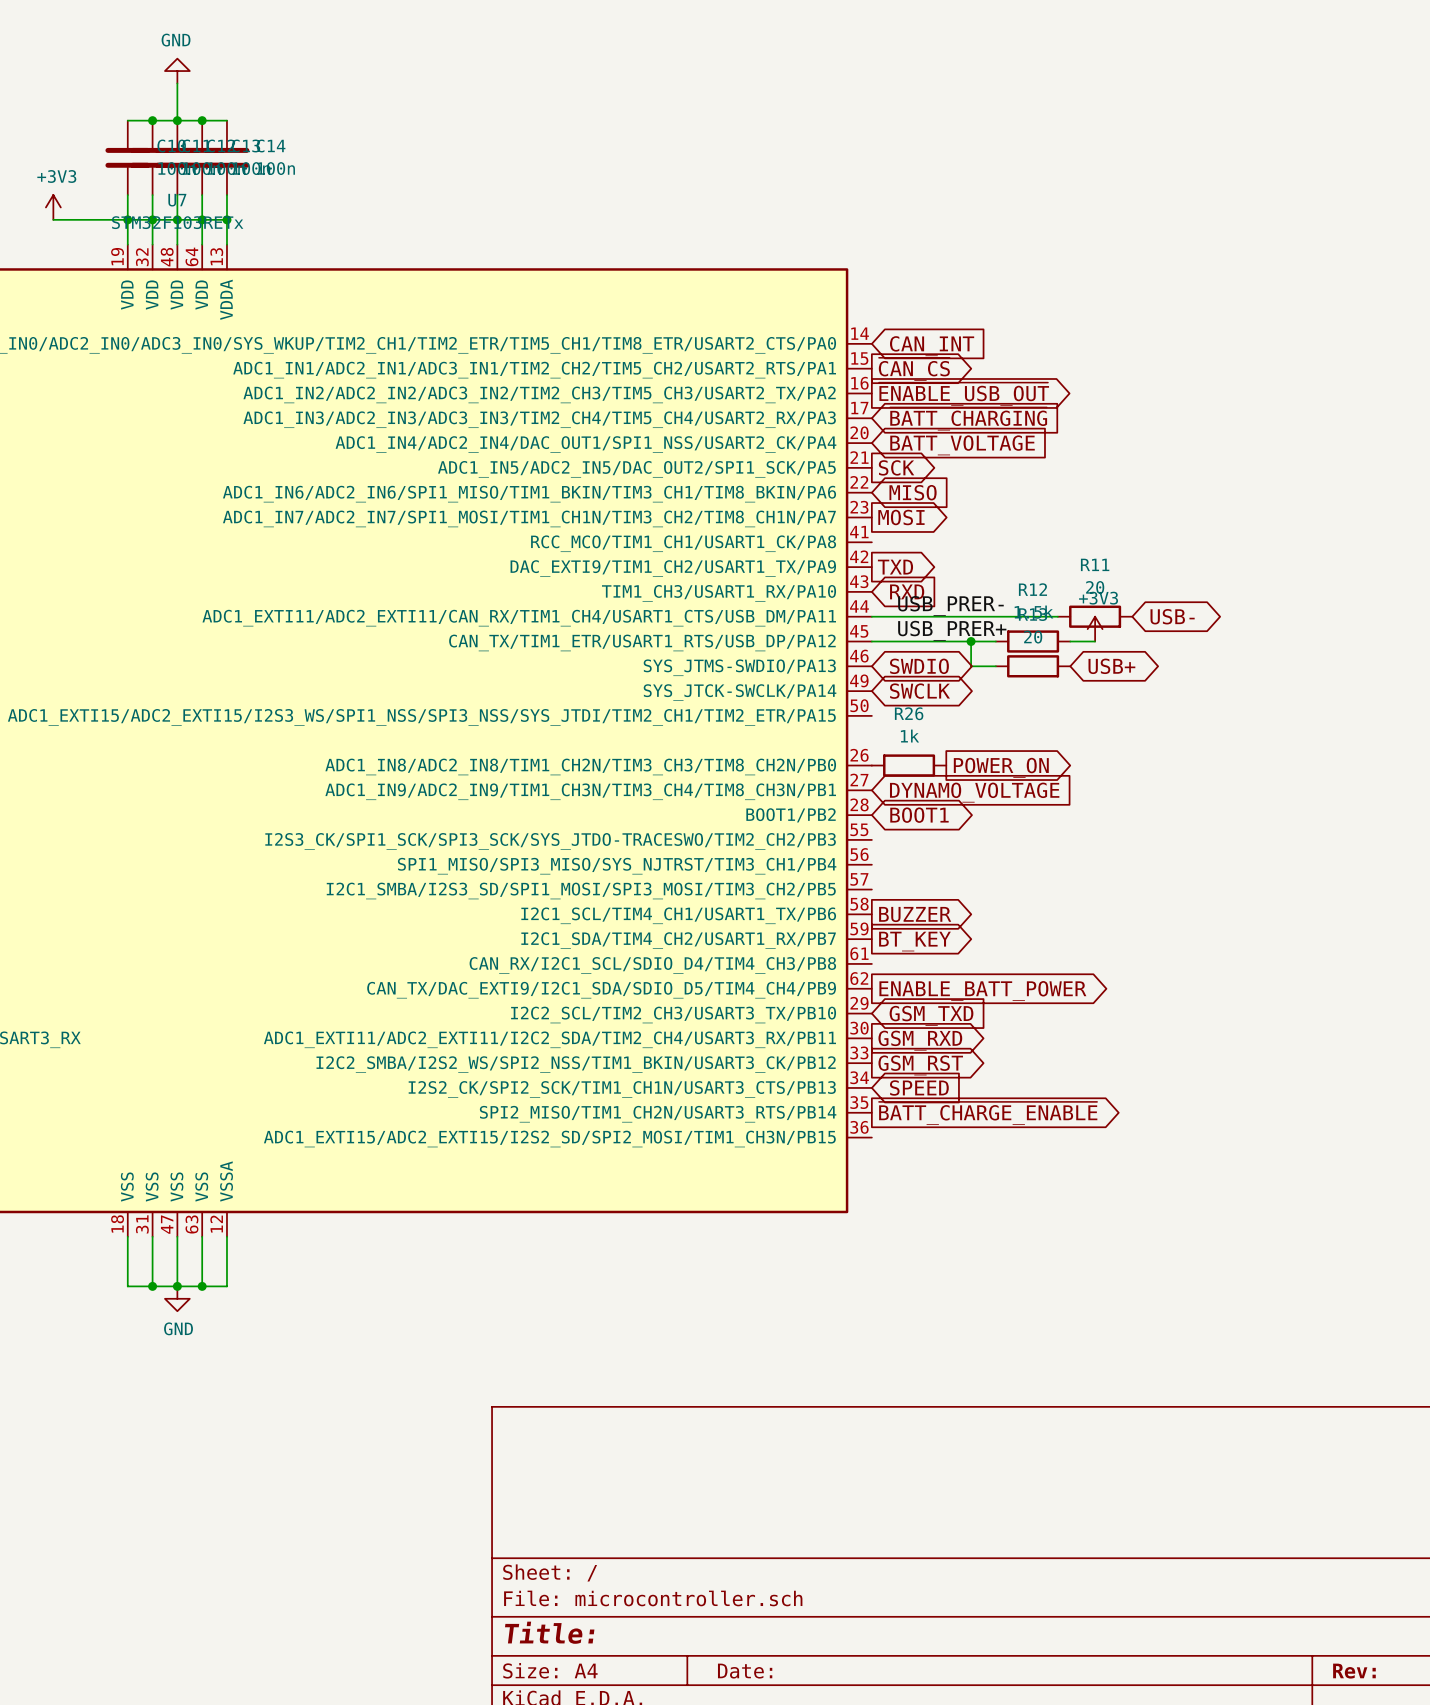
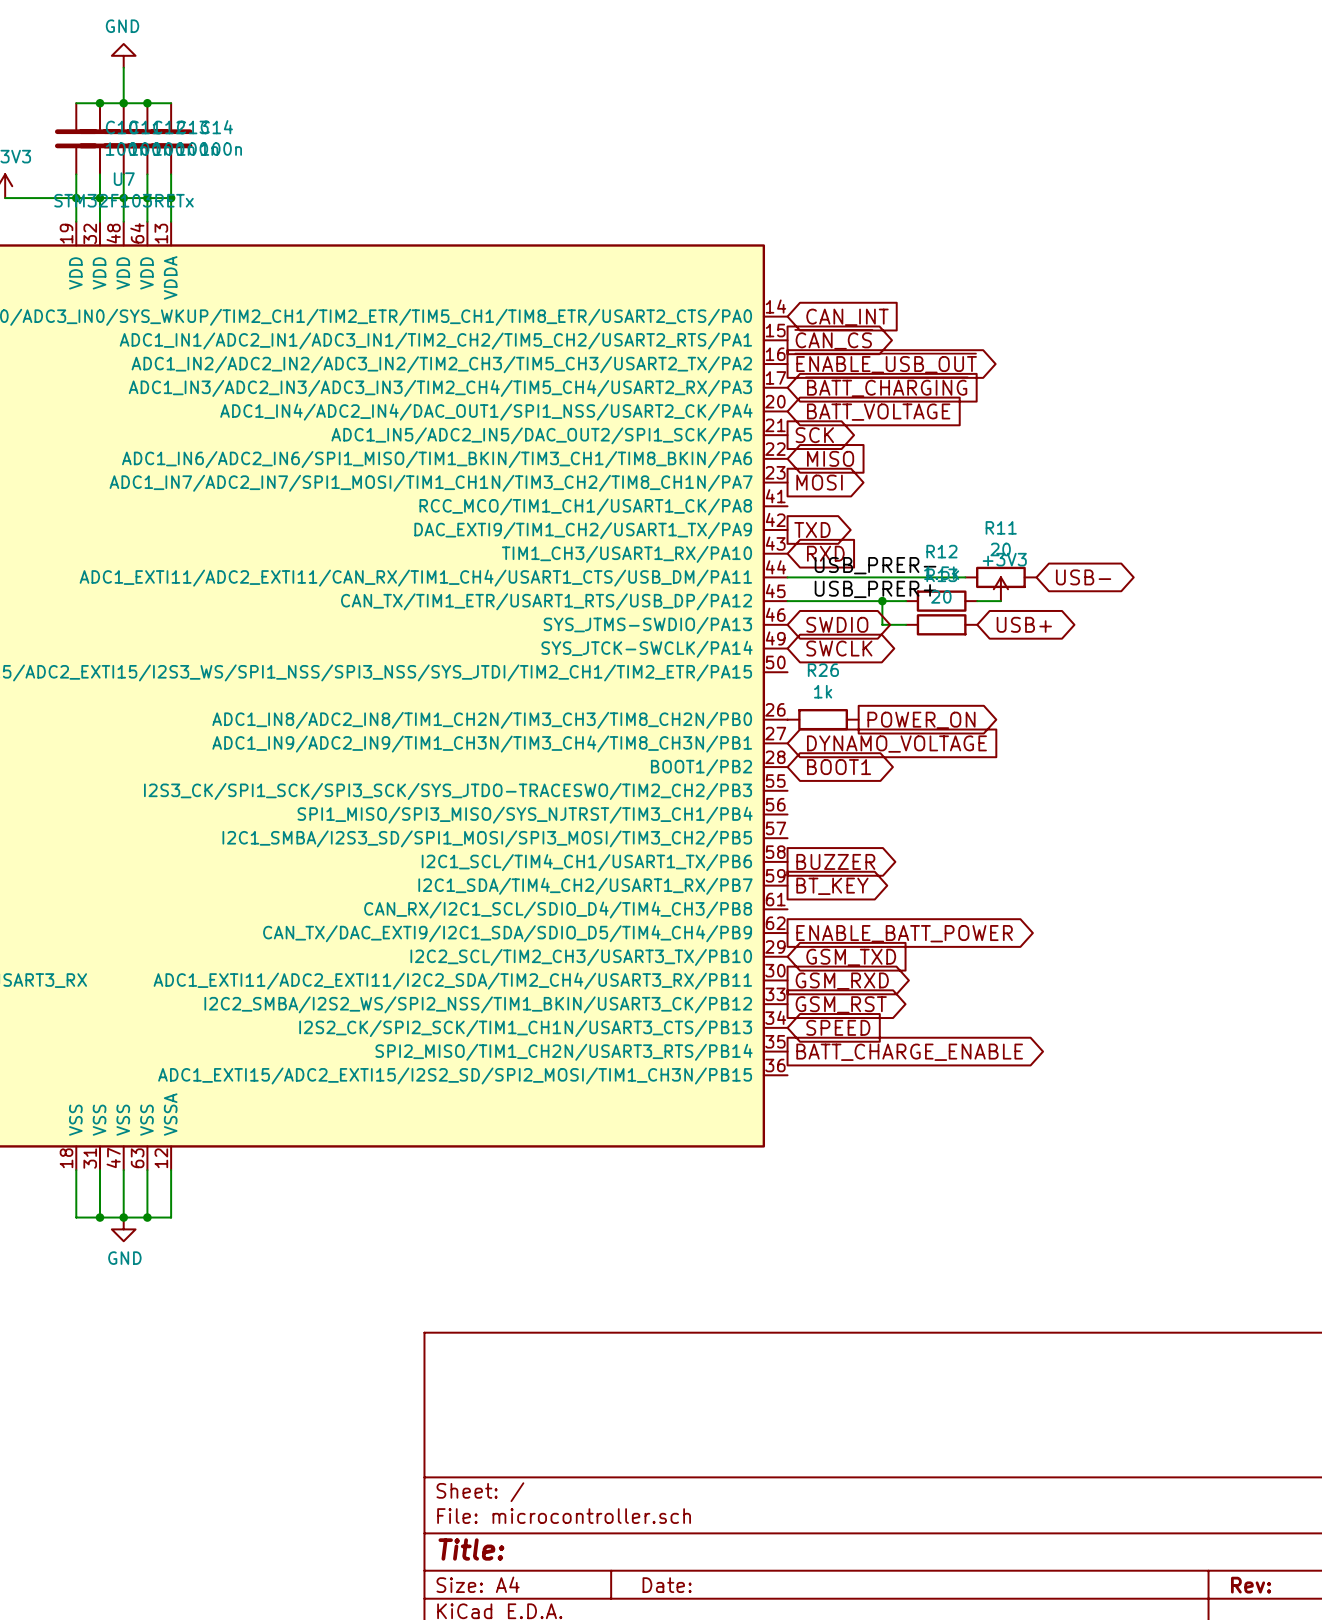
global label: ~{BATT_CHARGE_ENABLE} (988, 1113) -> BATT_CHARGE_ENABLE (909, 1052)

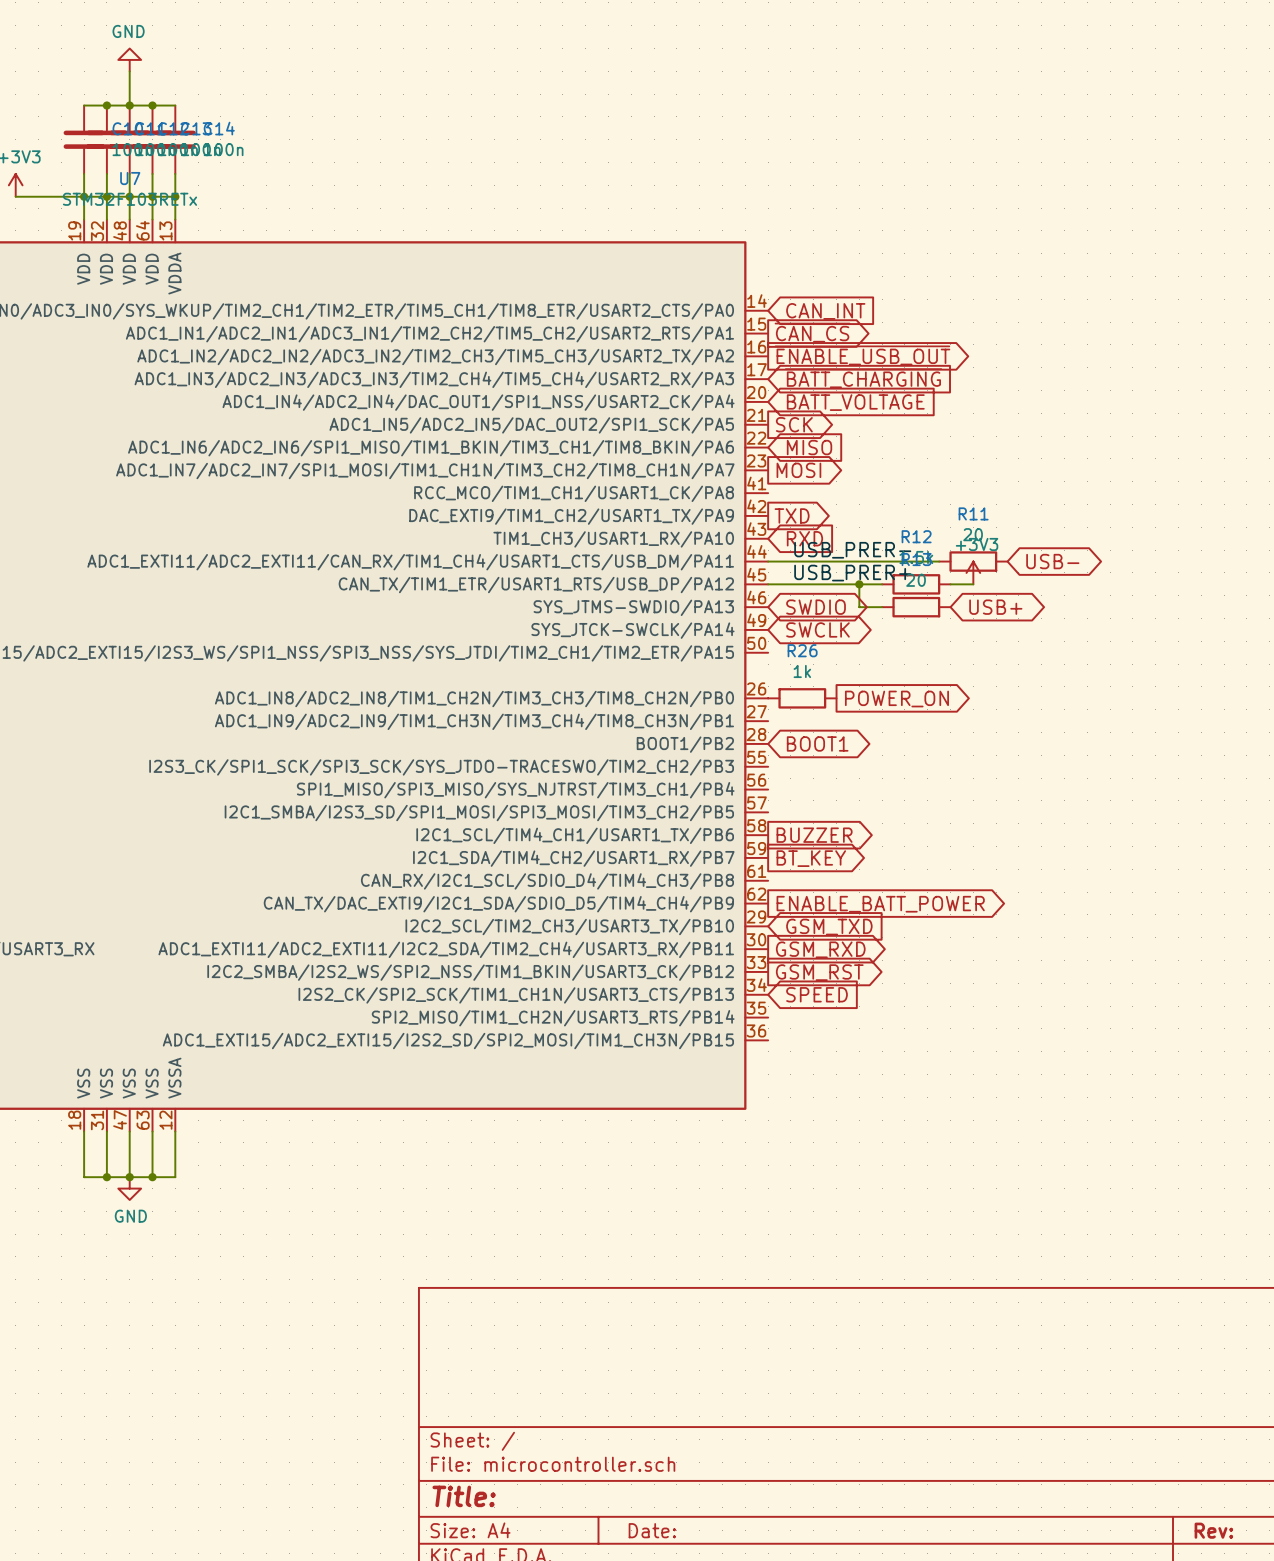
global label: DYNAMO_VOLTAGE (896, 744) -> none
global label: BATT_CHARGE_ENABLE (909, 1052) -> none

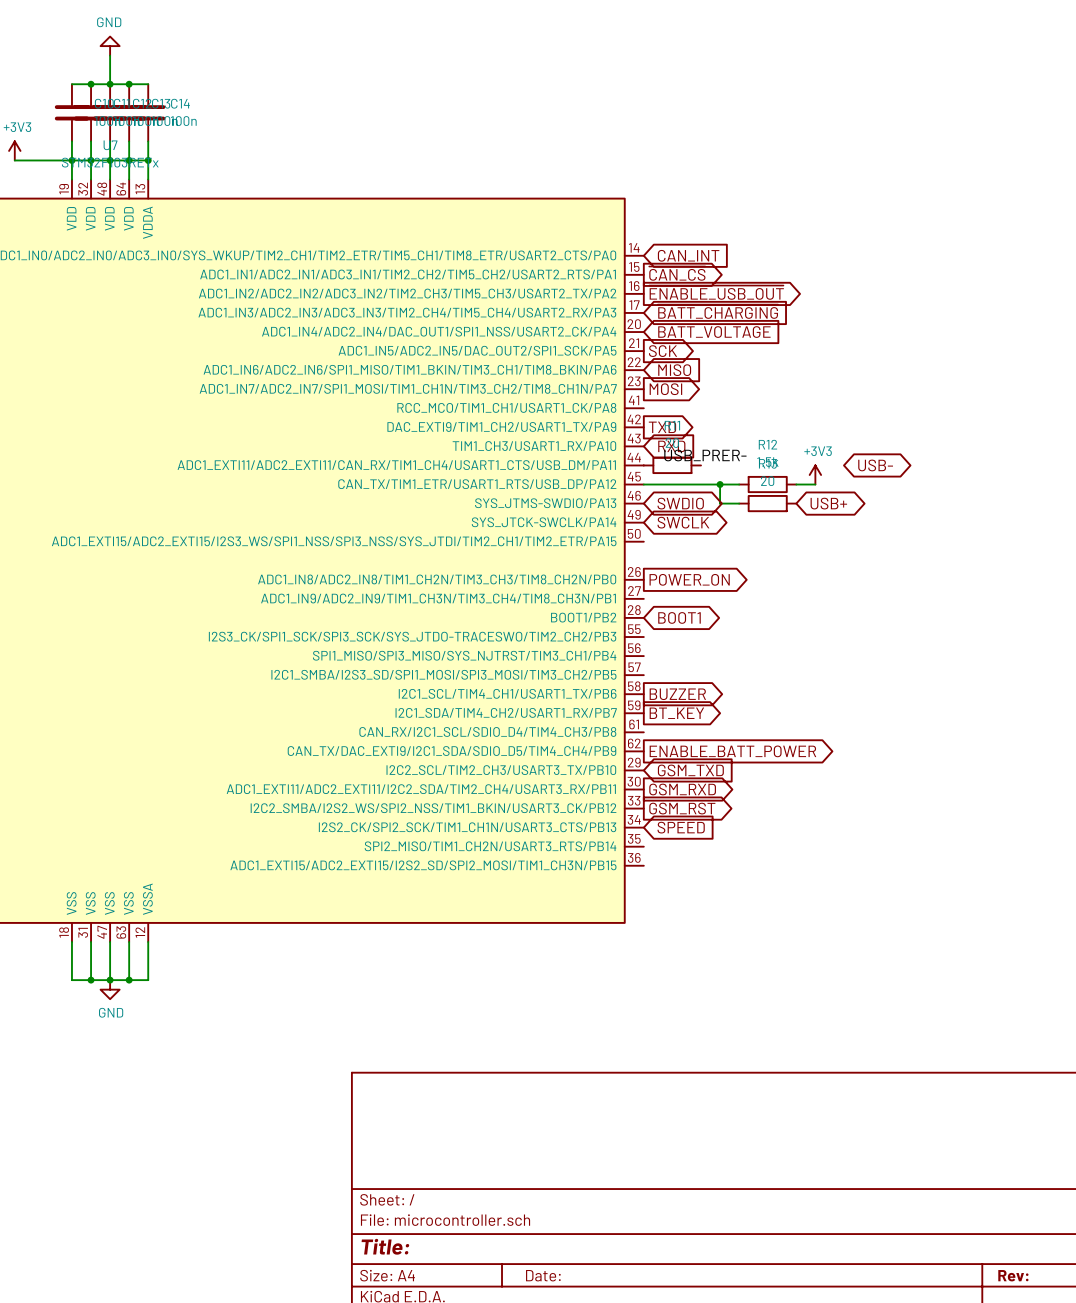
wire: (768, 561) (939, 561) -> none
R11 position: (973, 561) -> (672, 465)
label: USB_PRER+ (852, 573) -> none
R26: 1k (802, 698) -> none
global label position: POWER_ON (896, 699) -> POWER_ON (689, 579)

